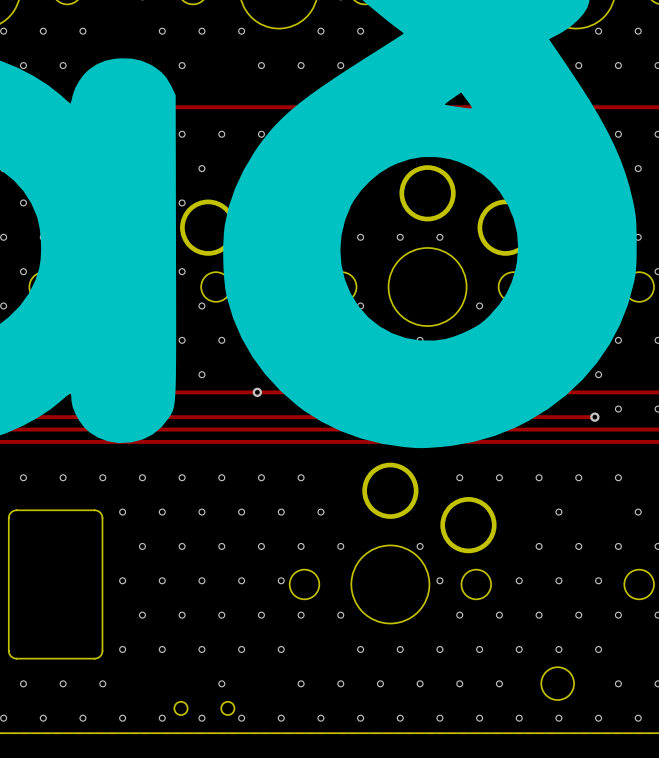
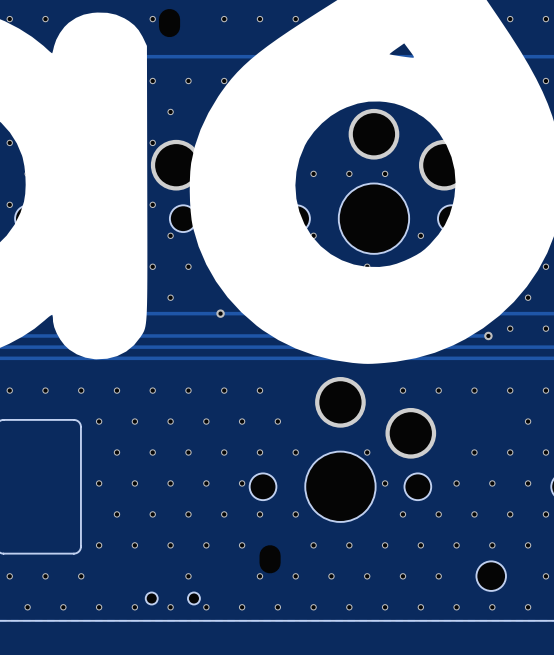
via: none -> (510, 328)
track: (554, 417) (594, 417) -> none
via position: (594, 417) -> (488, 335)
via position: (558, 512) -> (528, 421)

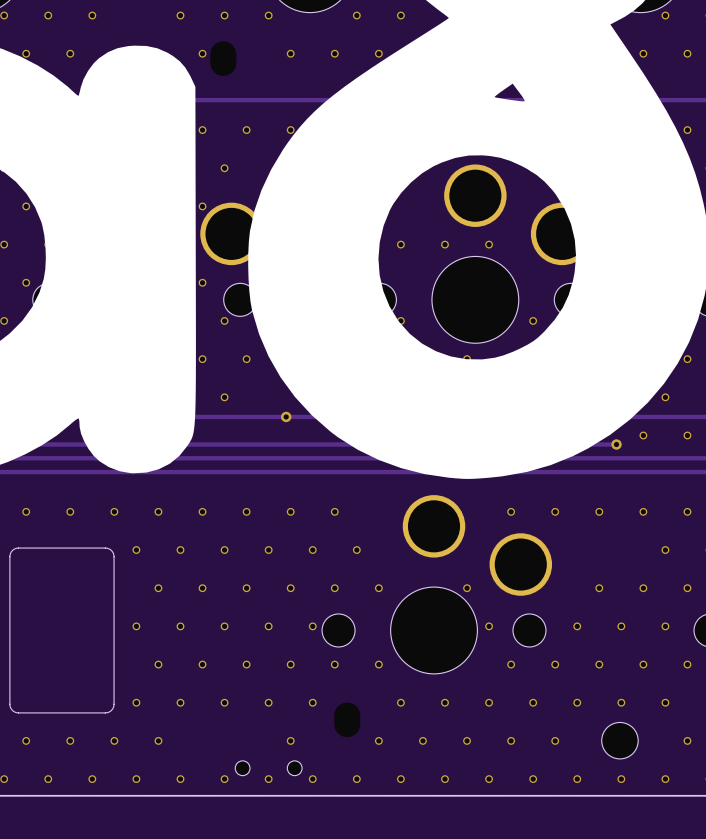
via: none -> (158, 740)
via: (188, 576) -> none
via: none -> (290, 740)
via: (259, 576) -> none
part position: (172, 598) -> (268, 768)

